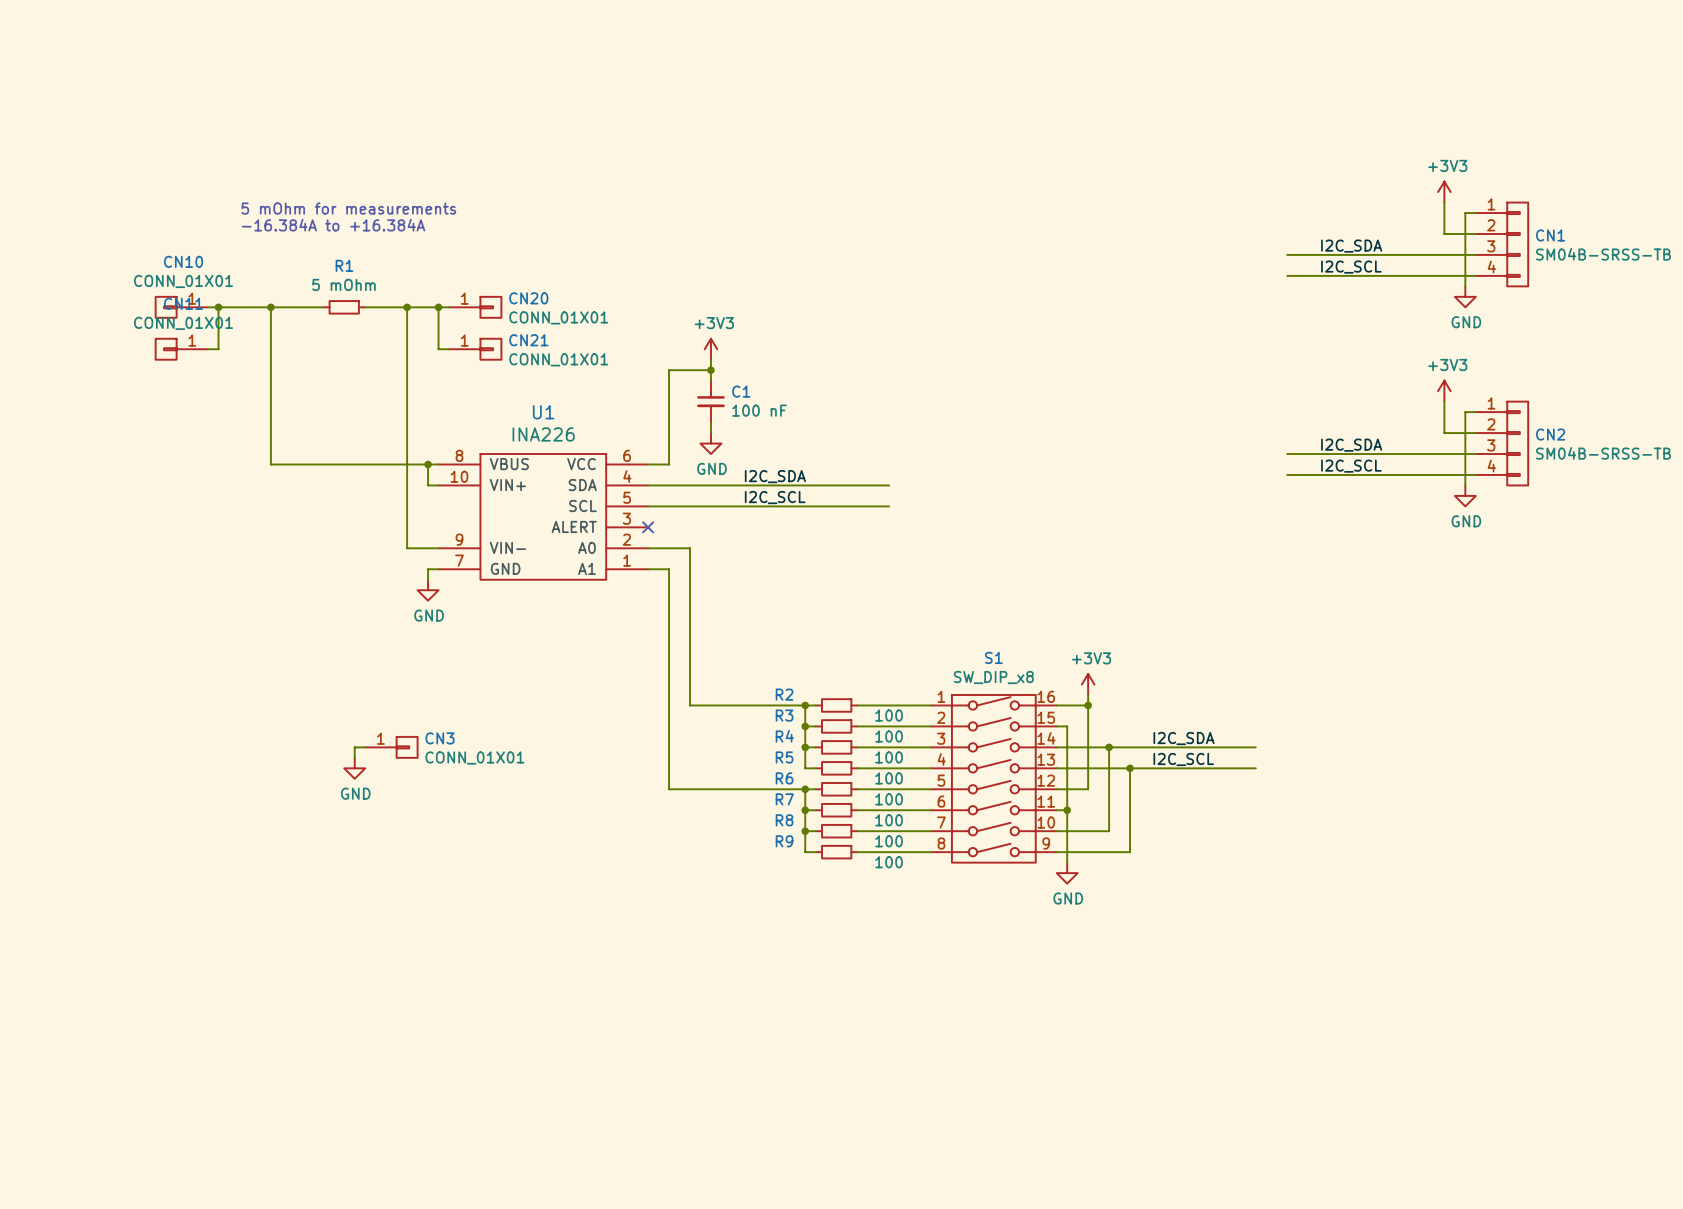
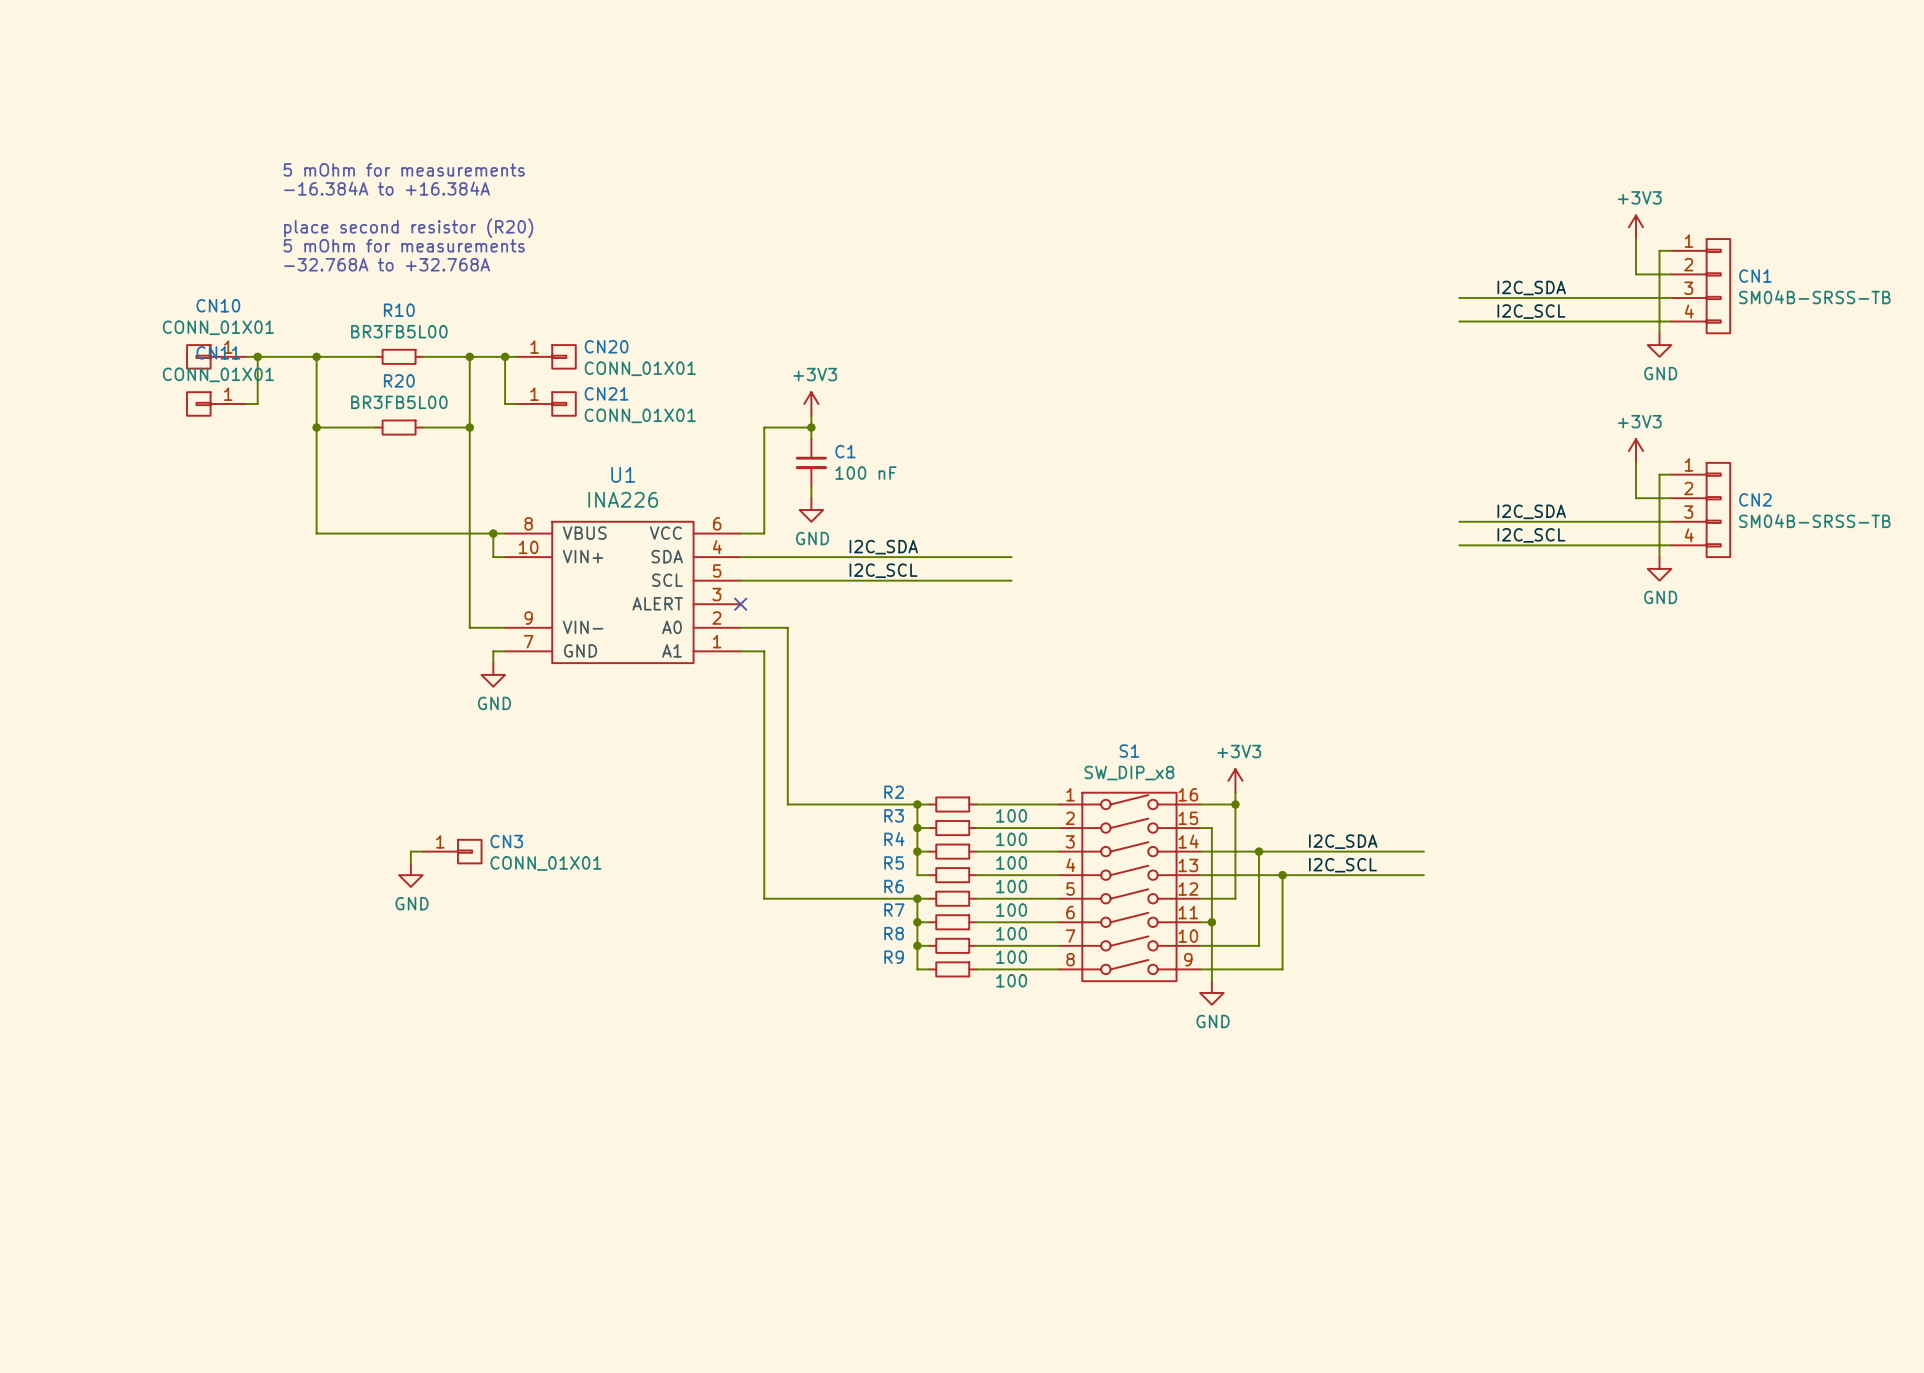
text: none -> 5 mOhm for measurements (404, 169)
text: none -> -16.384A to +16.384A (387, 188)
text: none -> place second resistor (R20) (408, 228)
text: -16.384A to +16.384A (333, 225) -> -32.768A to +32.768A (387, 264)
R1 name: R1 (344, 265) -> R10 (399, 310)
R1 value: 5 mOhm (343, 284) -> BR3FB5L00 (399, 331)
wire: none -> (316, 427) (375, 427)
junction: none -> (316, 427)
R20: none -> BR3FB5L00 (399, 427)
wire: none -> (422, 427) (469, 427)
junction: none -> (469, 427)

